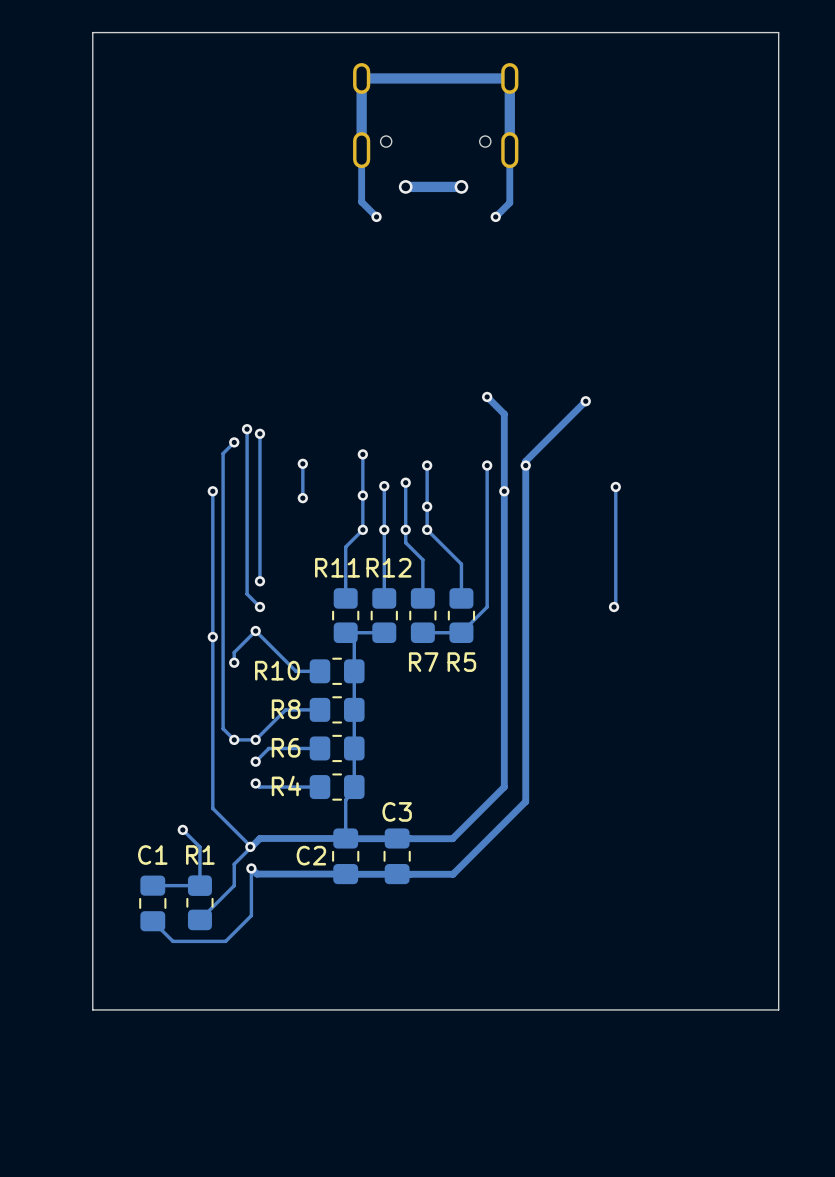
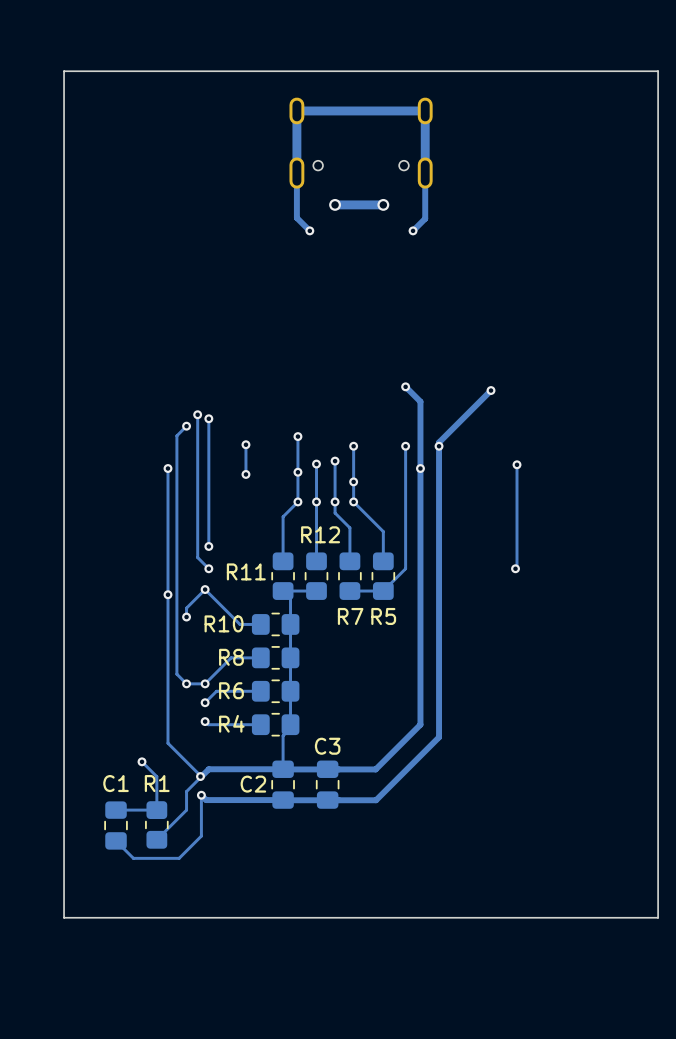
R11 name position: R11 (337, 567) -> R11 (246, 571)

